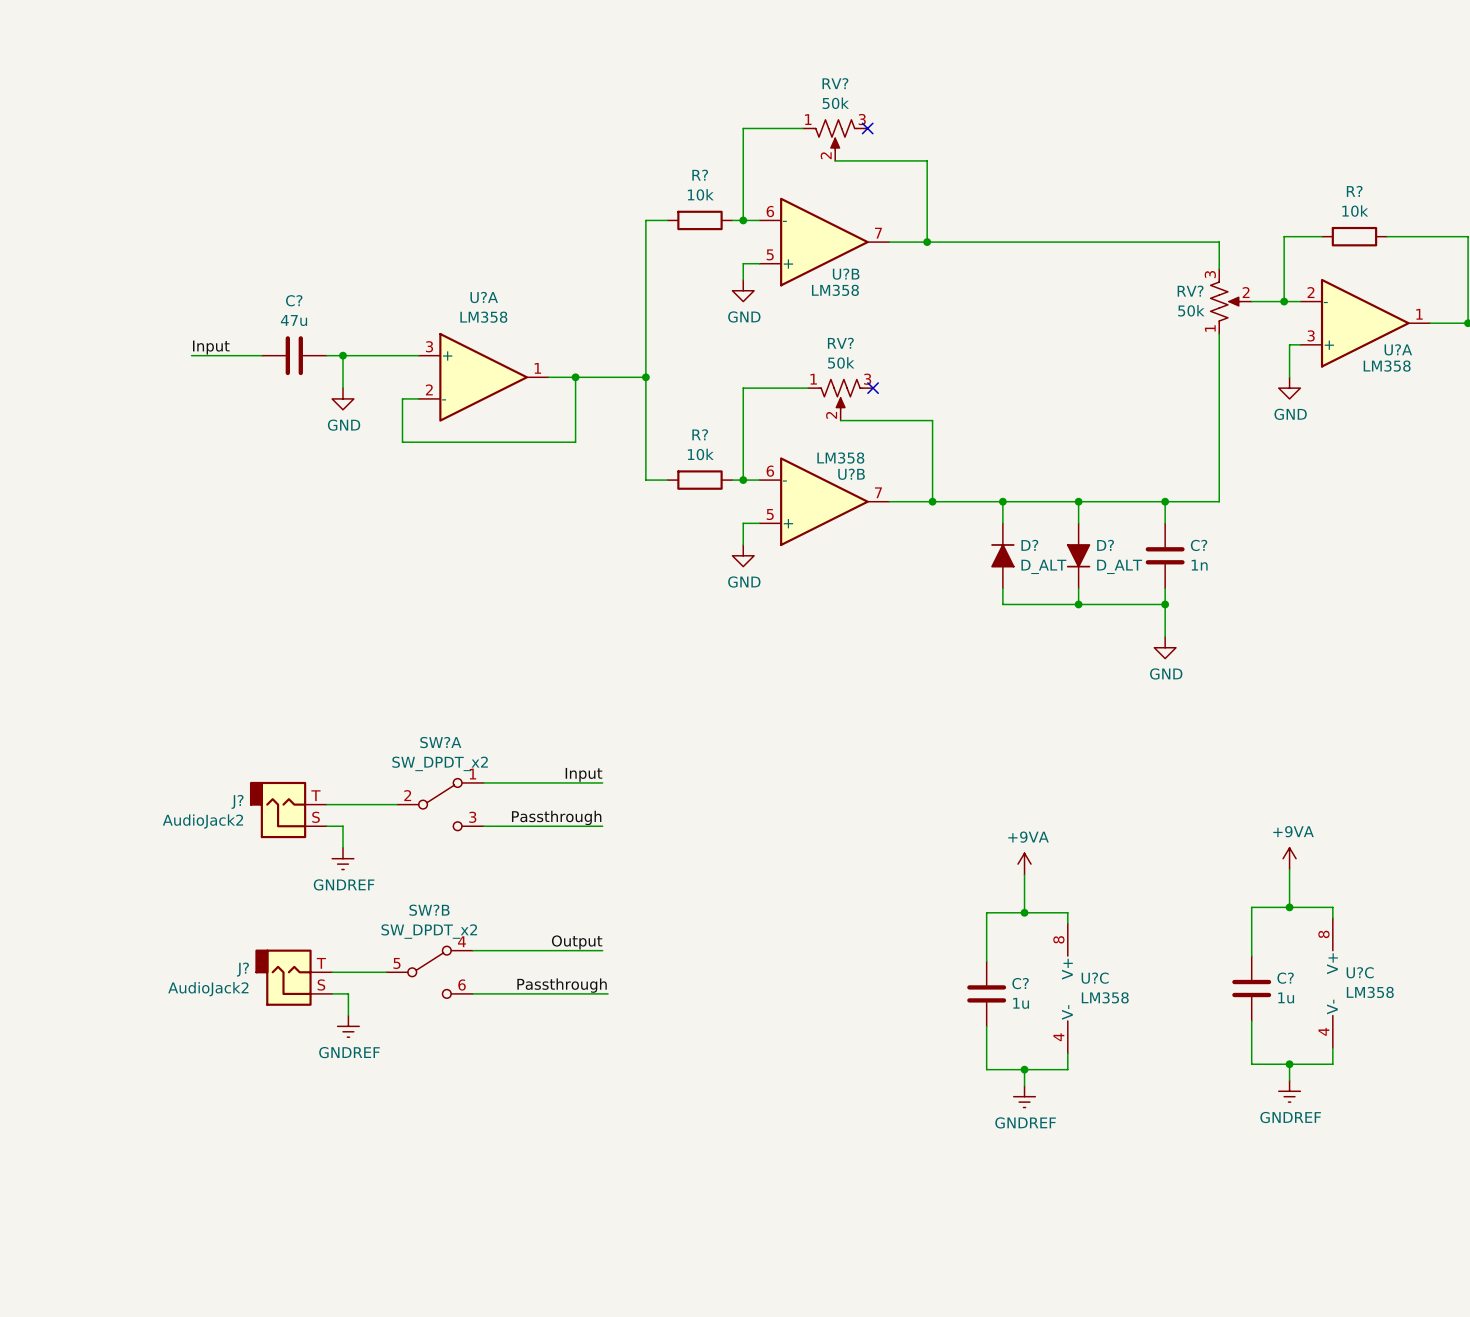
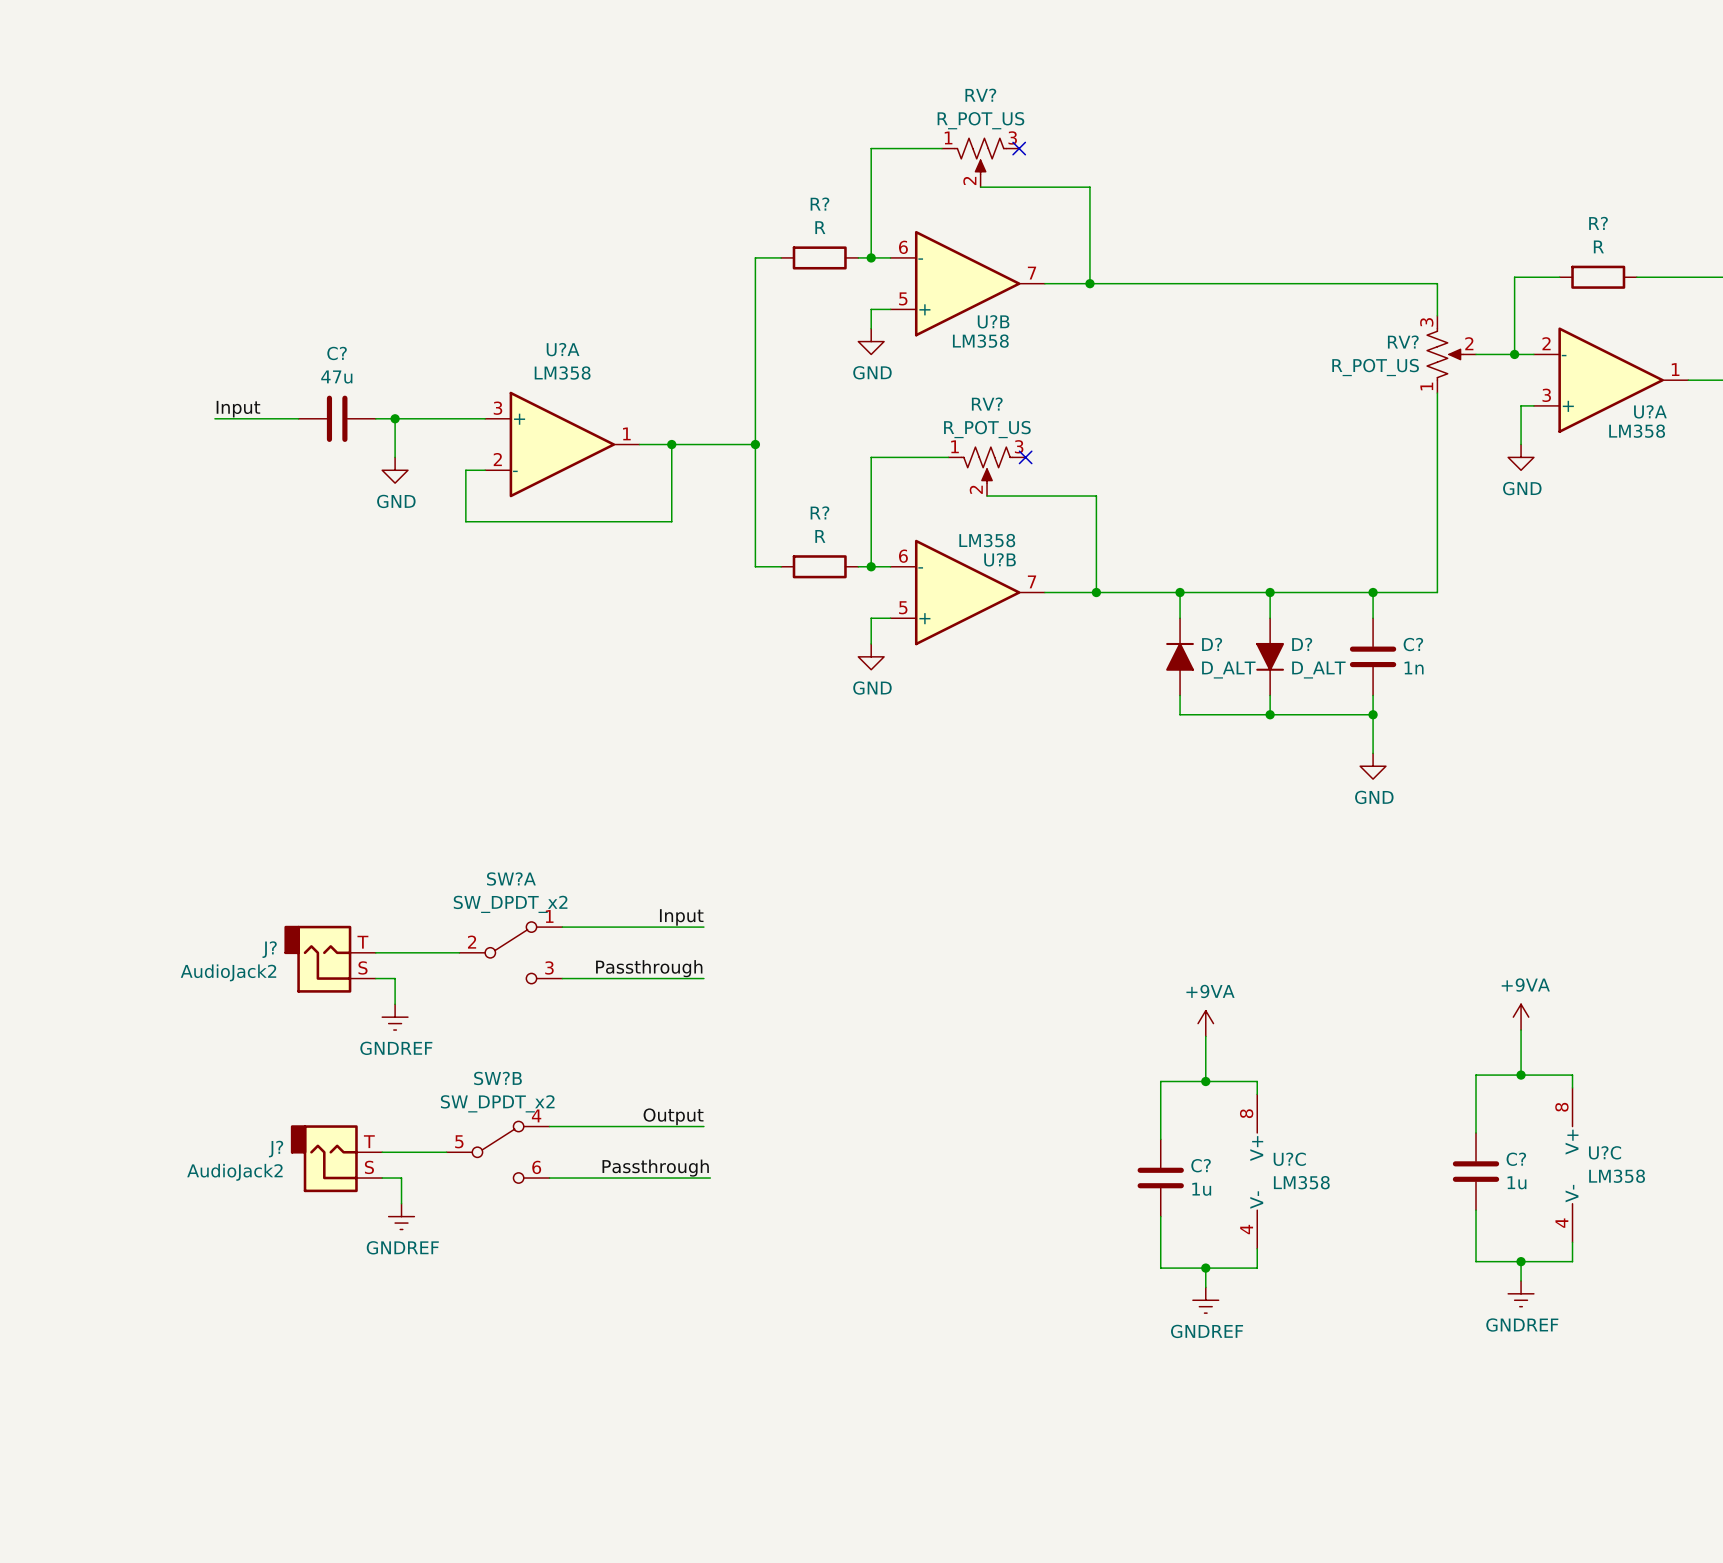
RV? value: 50k (835, 103) -> R_POT_US (980, 120)
R? value: 10k (700, 194) -> R (820, 227)
R? value: 10k (1355, 211) -> R (1598, 246)
RV? value: 50k (1191, 310) -> R_POT_US (1375, 367)
RV? value: 50k (841, 362) -> R_POT_US (987, 429)
R? value: 10k (700, 454) -> R (820, 536)

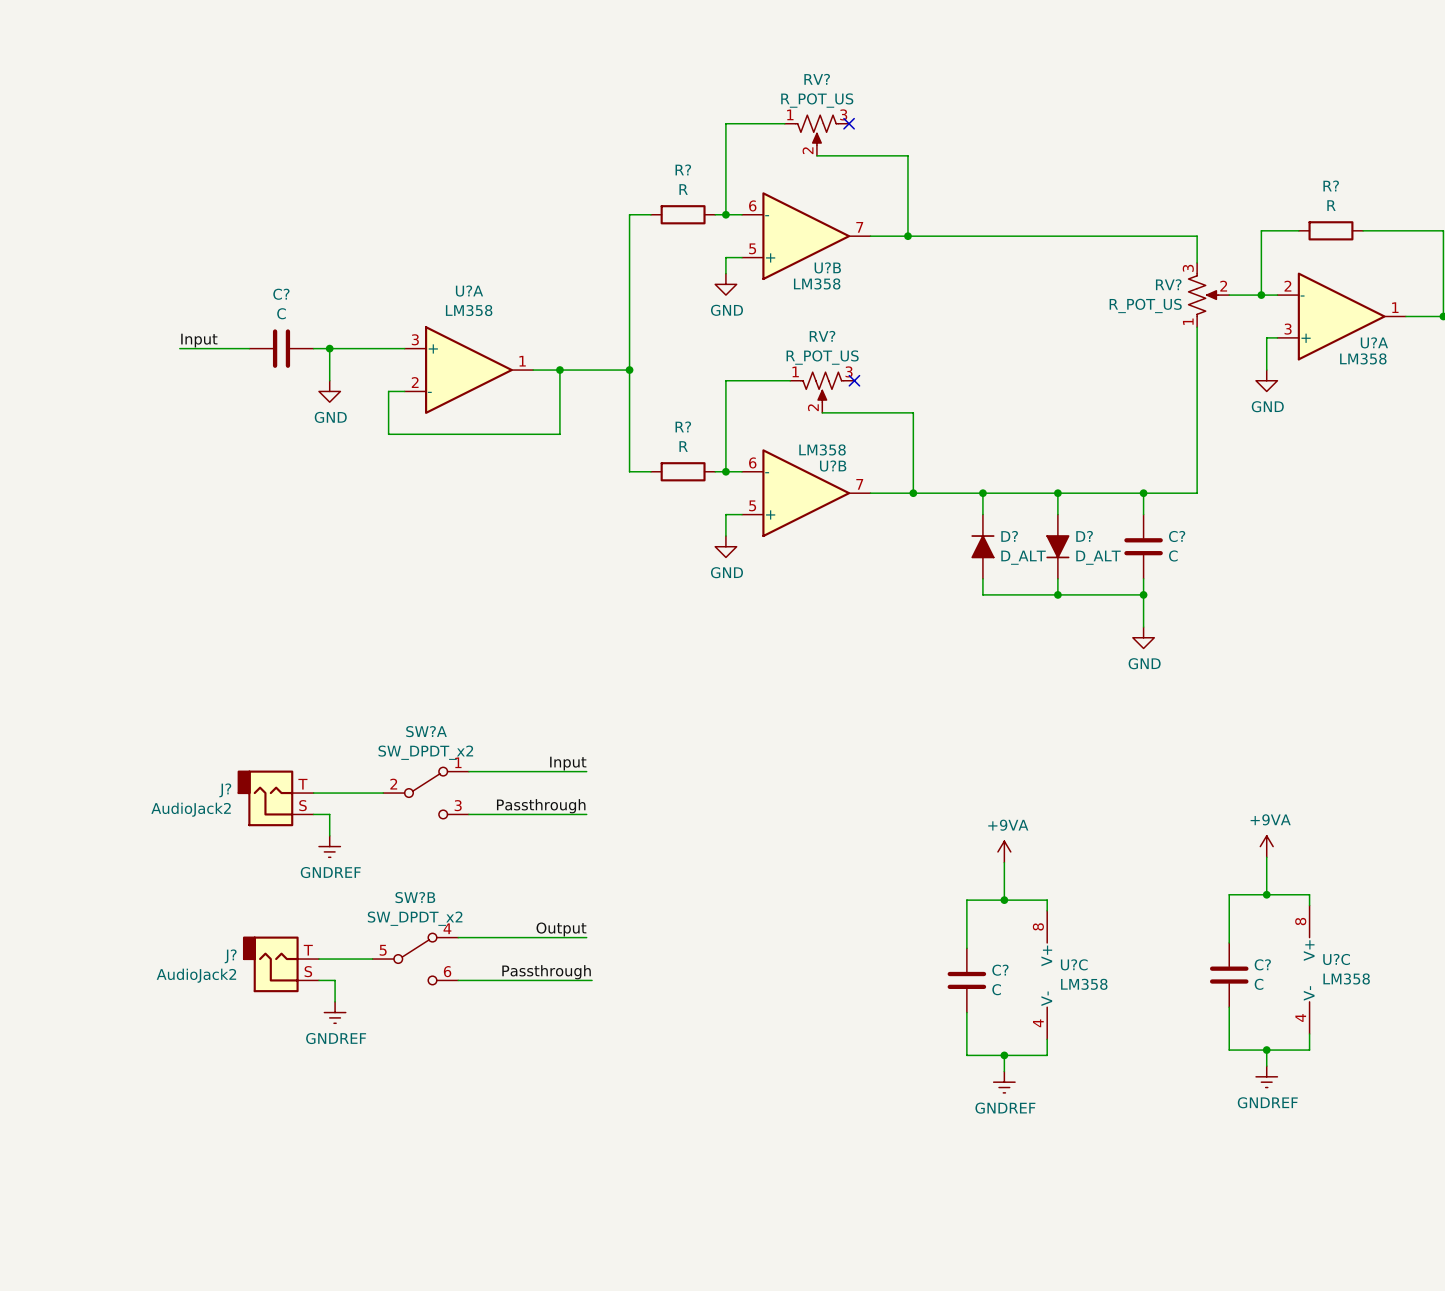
C? value: 47u (336, 377) -> C (281, 313)
C? value: 1n (1414, 667) -> C (1173, 555)
C? value: 1u (1516, 1182) -> C (1259, 984)
C? value: 1u (1201, 1189) -> C (996, 989)

